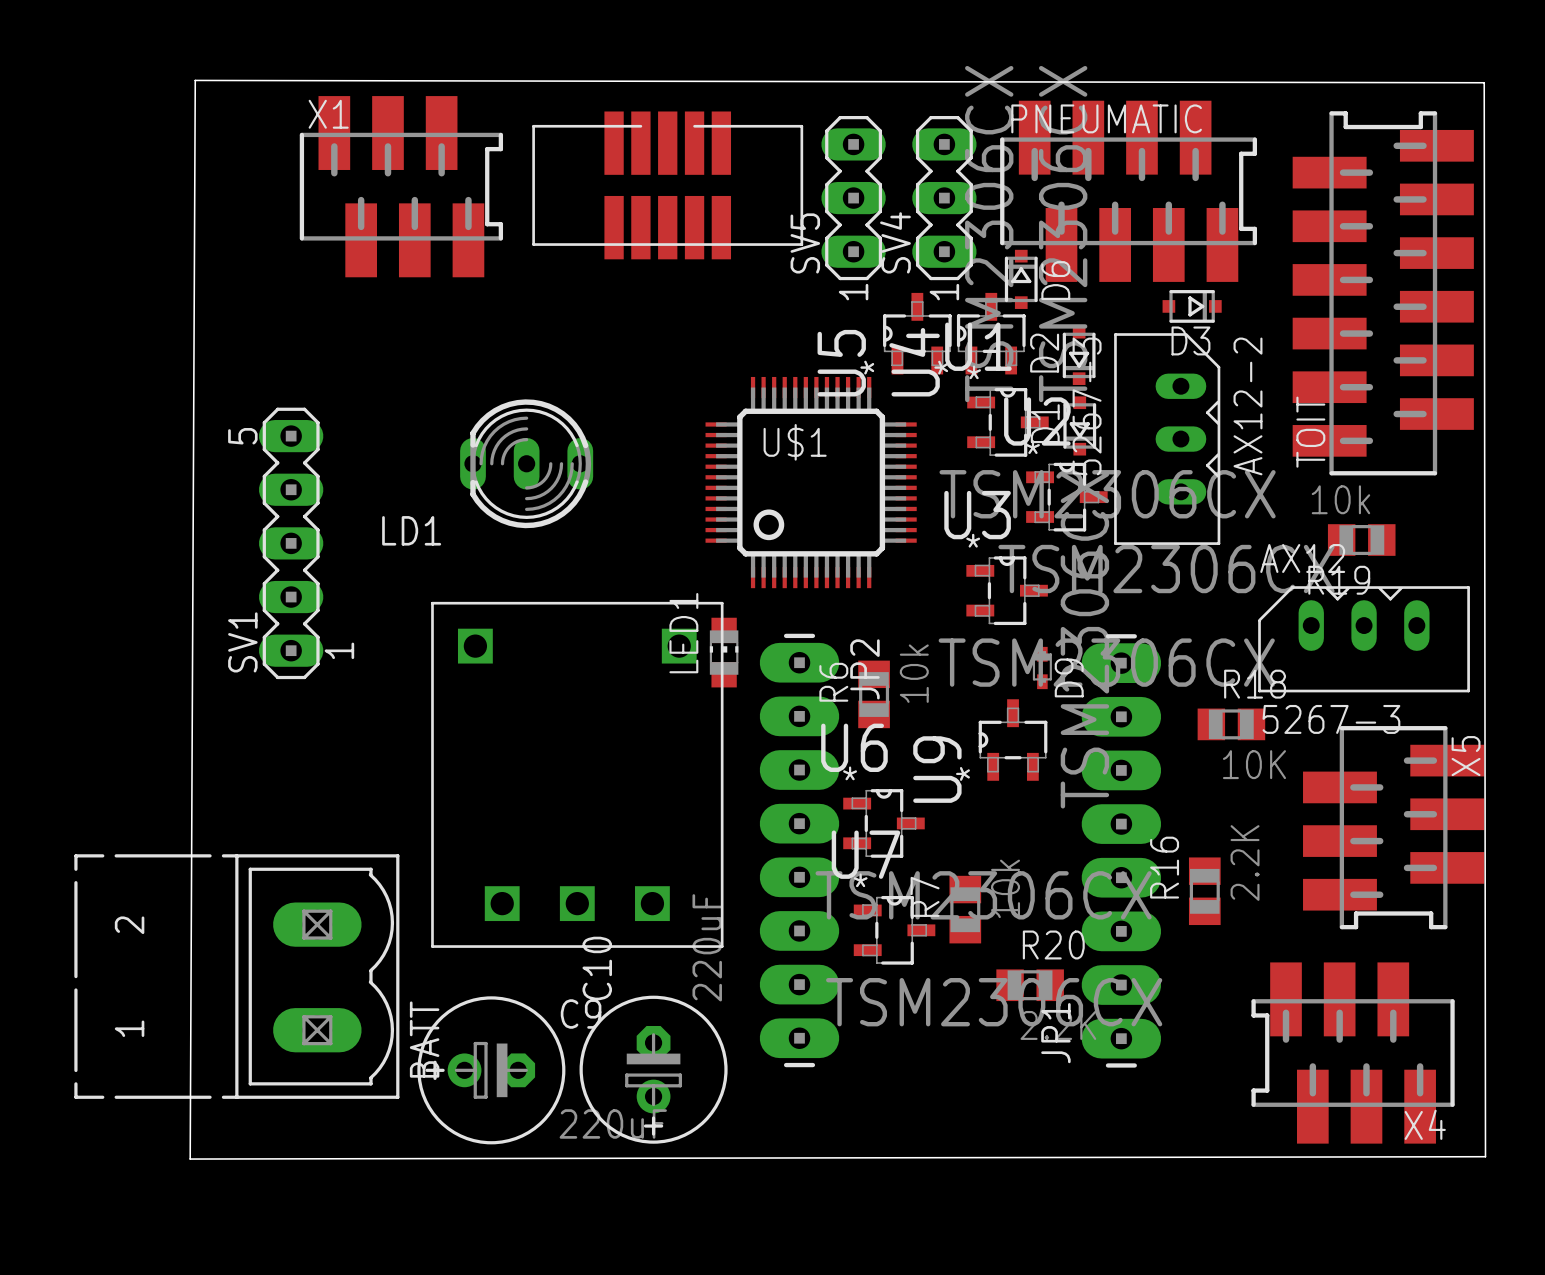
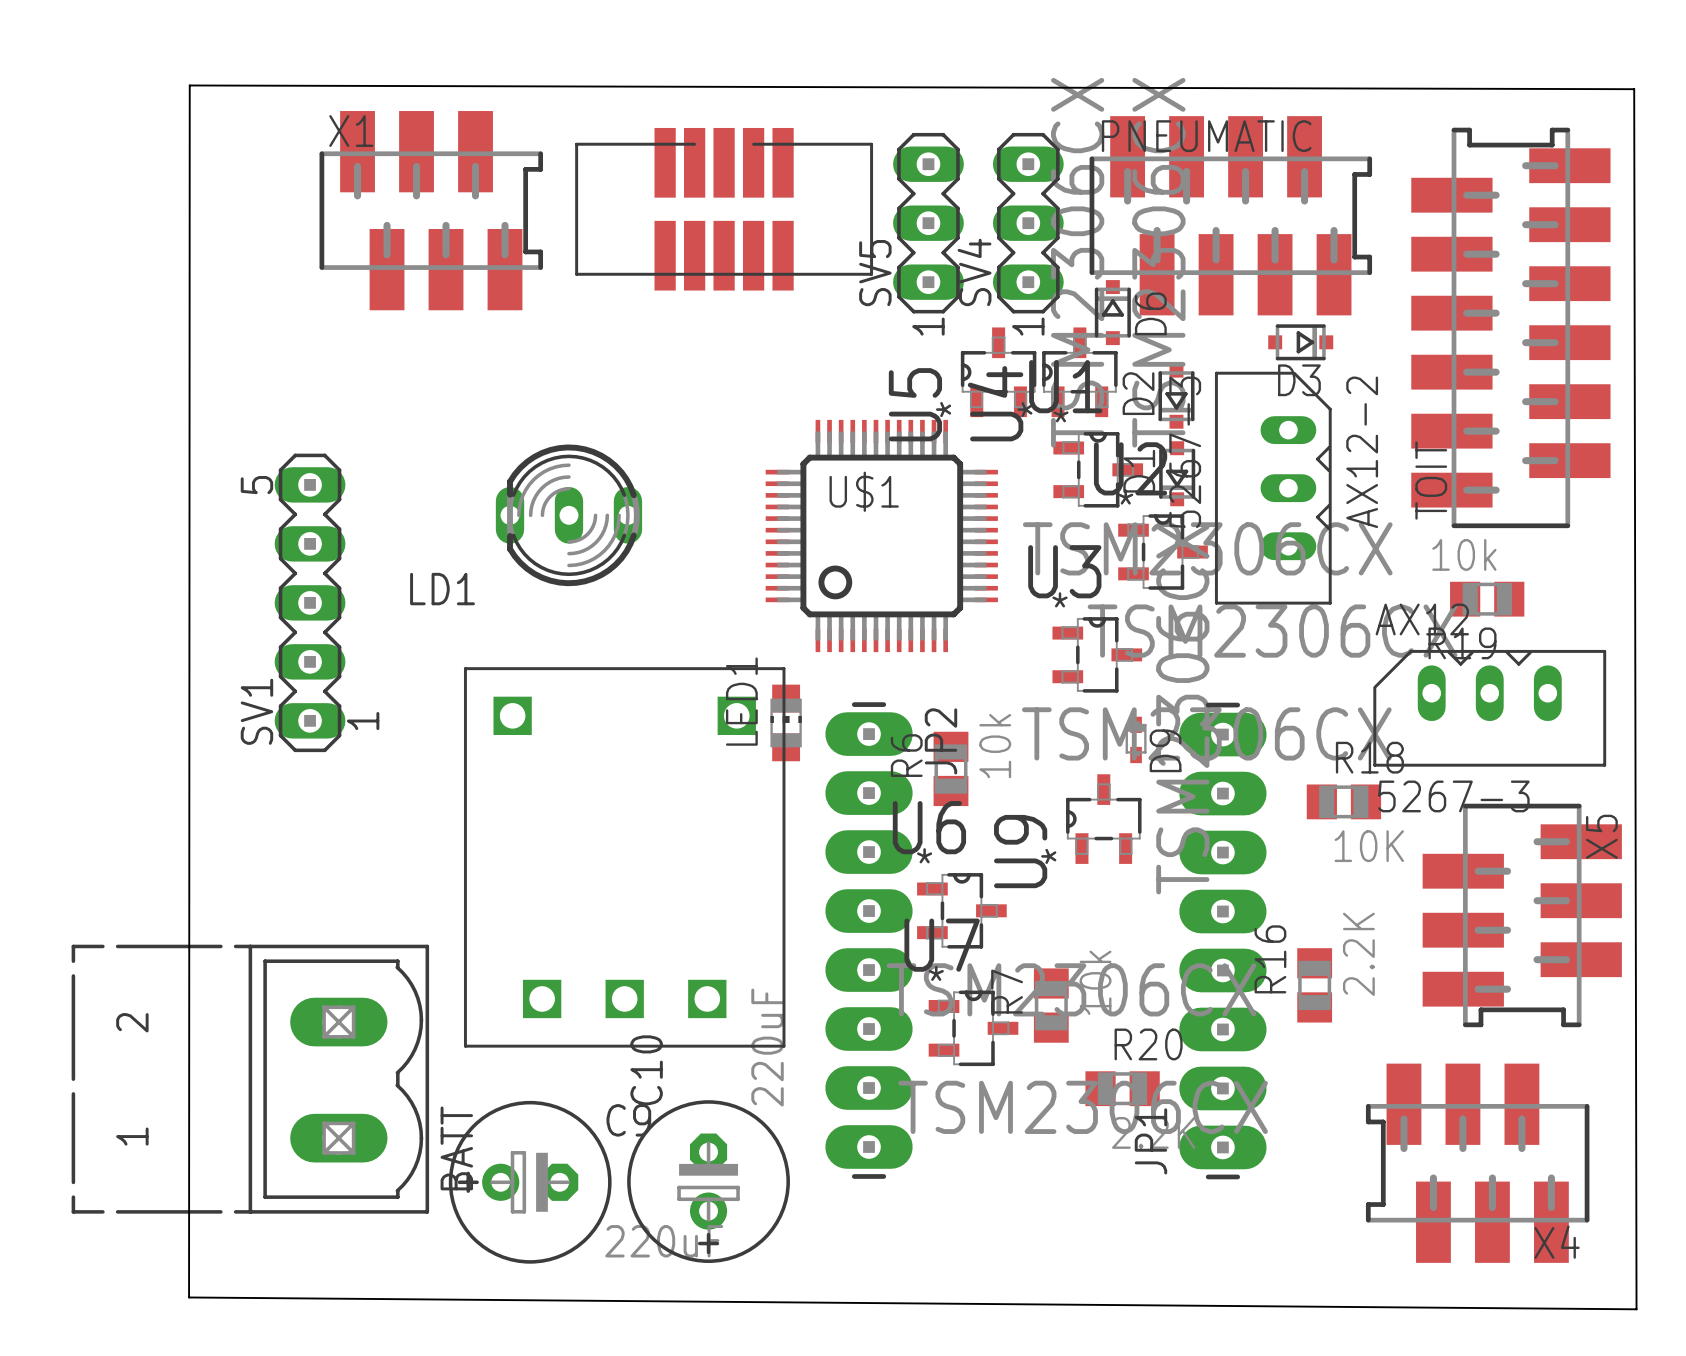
board edge: (195, 80) (1484, 82) (1485, 1156) (190, 1159) (195, 80) -> (189, 85) (189, 1297) (1636, 1309) (1634, 89) (189, 85)

